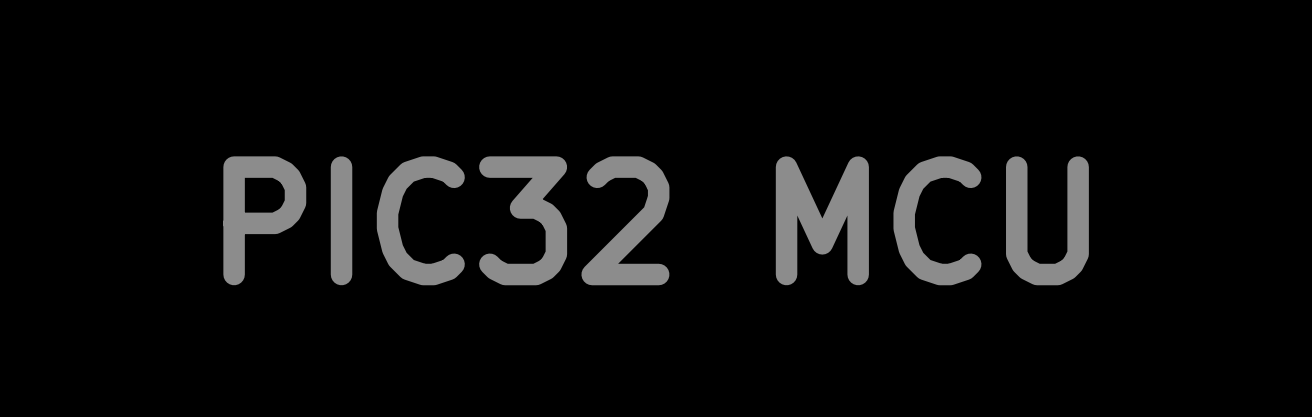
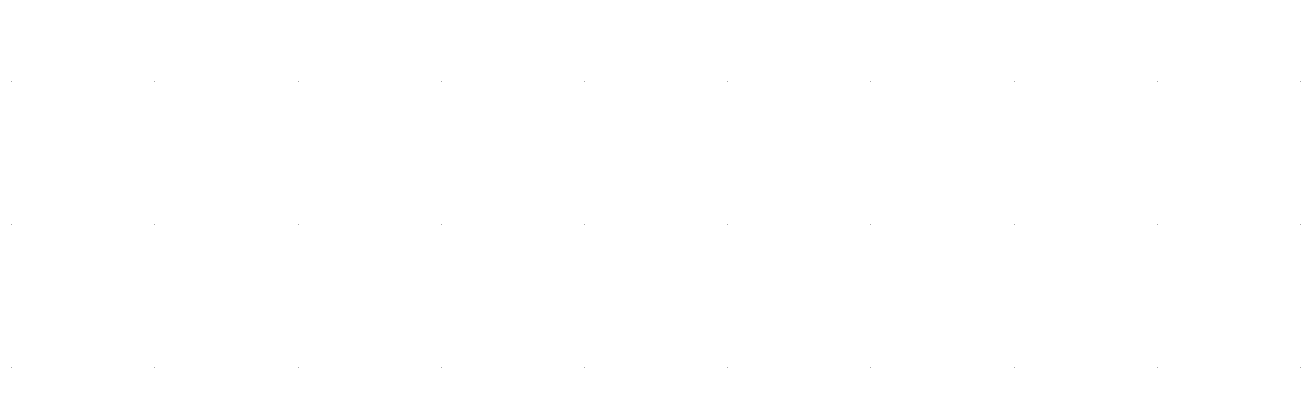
text: PIC32 MCU (656, 220) -> none

